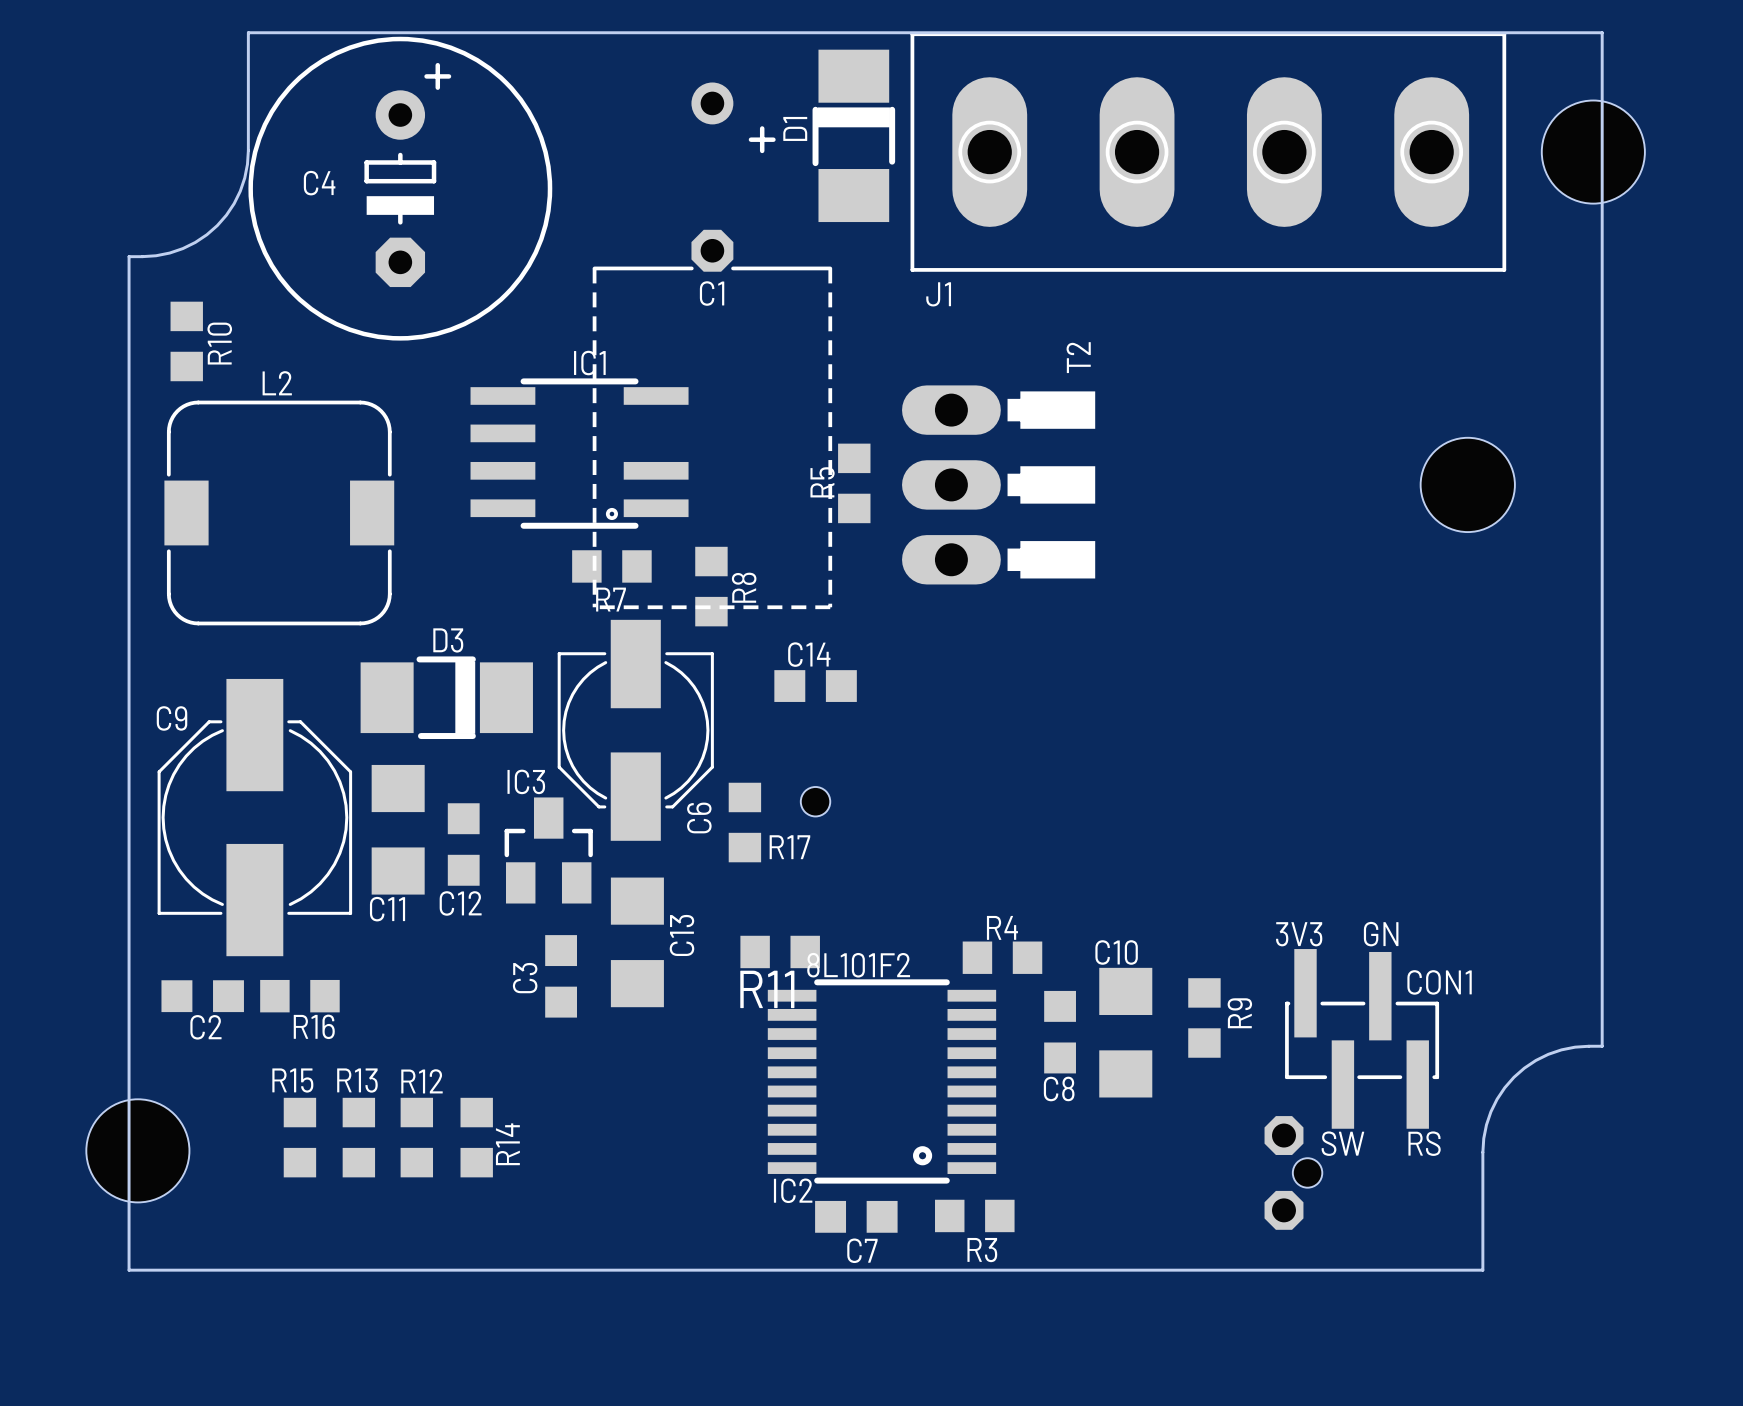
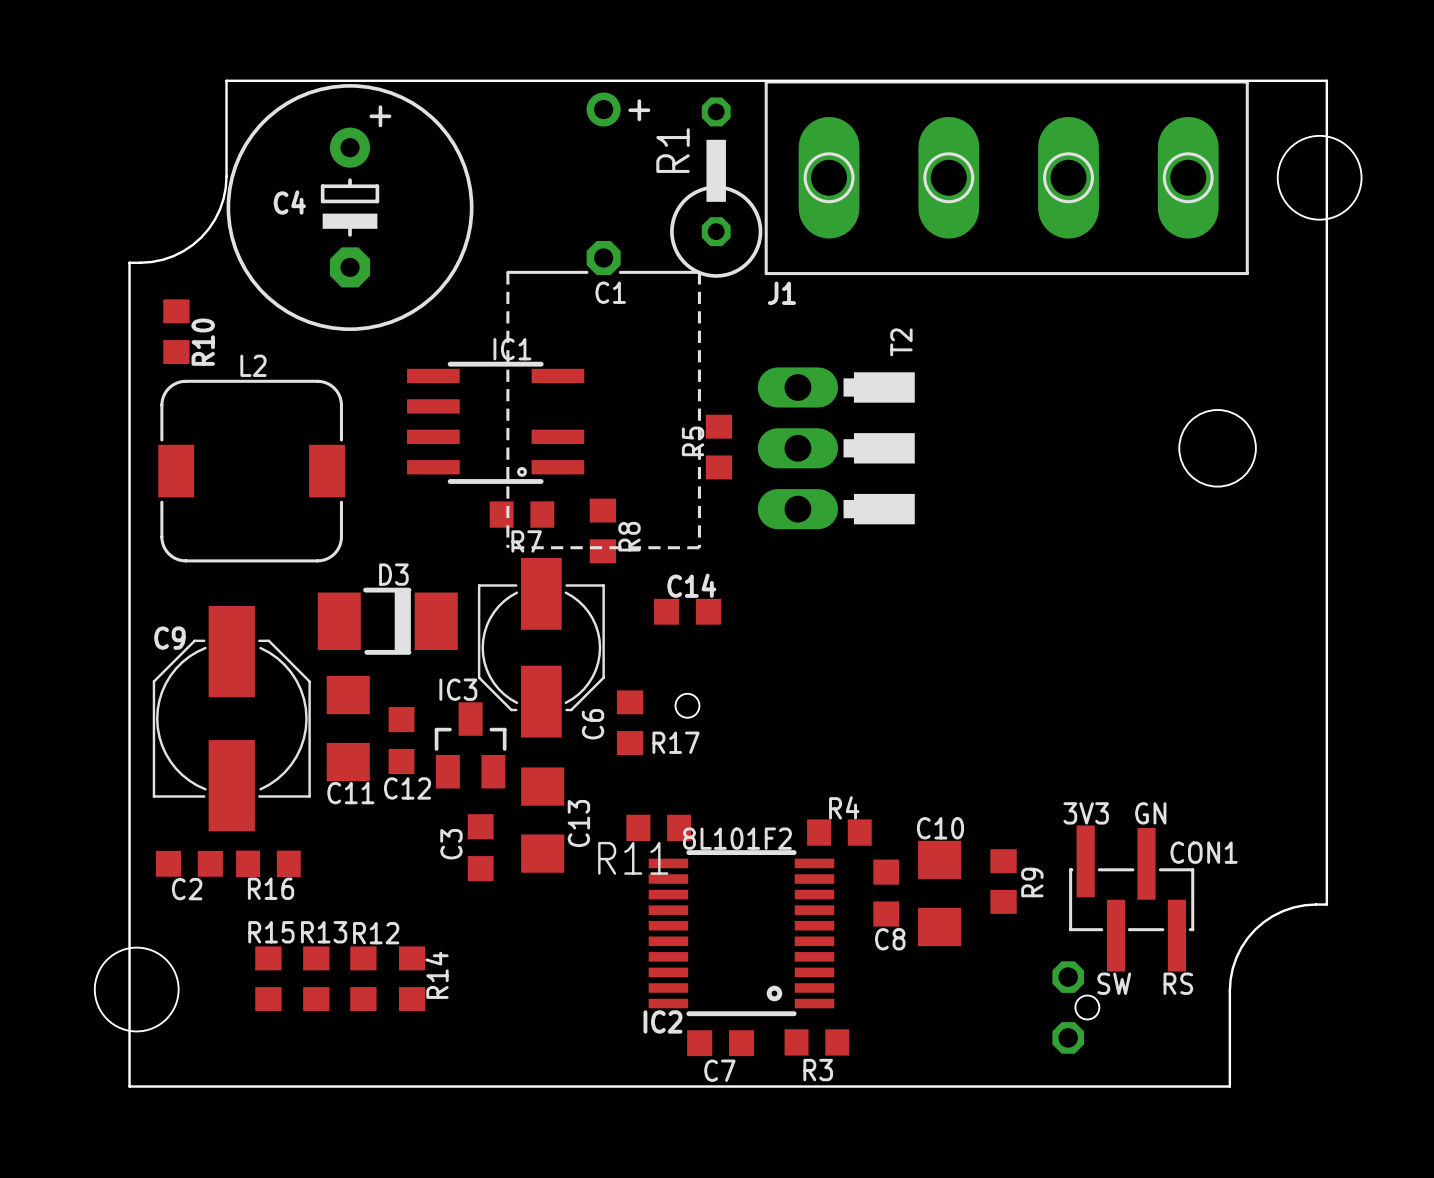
C1 footprint: [592, 82, 833, 610] -> [506, 92, 701, 550]
D1: (853, 135) -> none
R1: none -> (716, 187)

